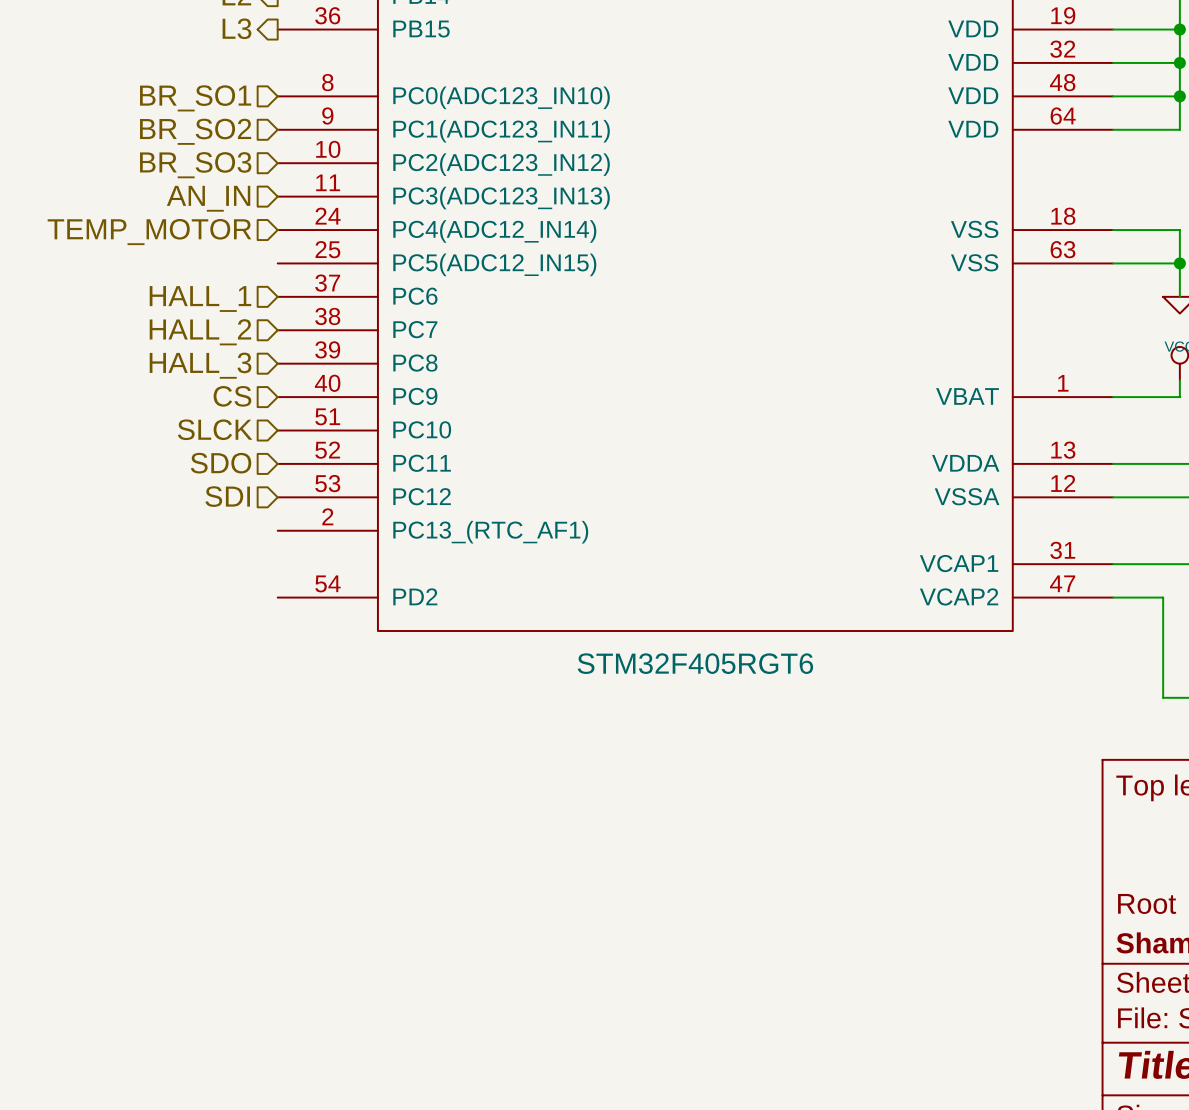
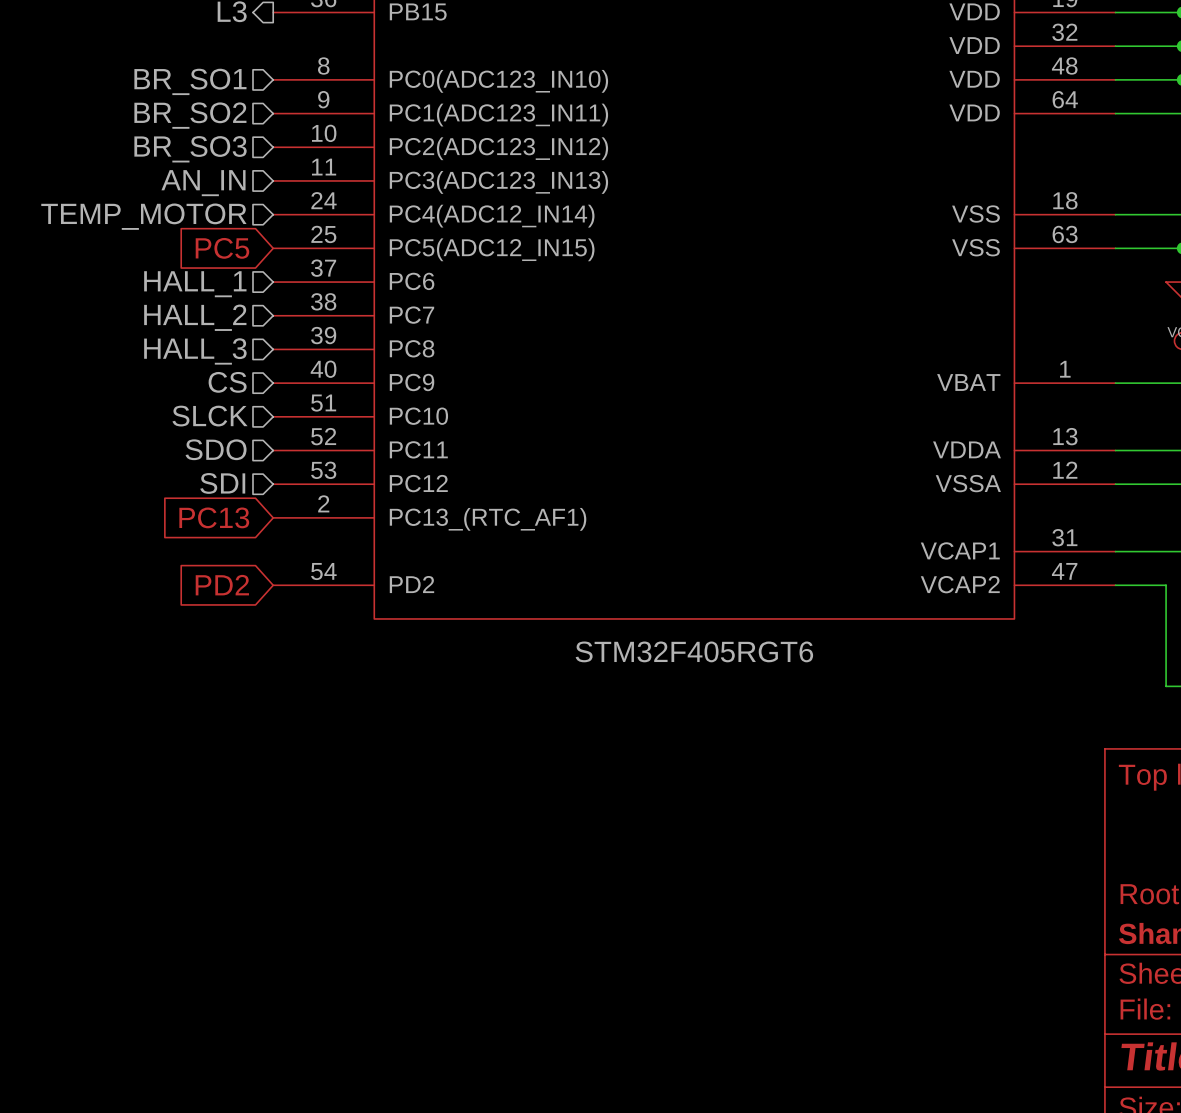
global label: none -> PC5 (222, 248)
global label: none -> PC13 (214, 517)
global label: none -> PD2 (222, 585)

